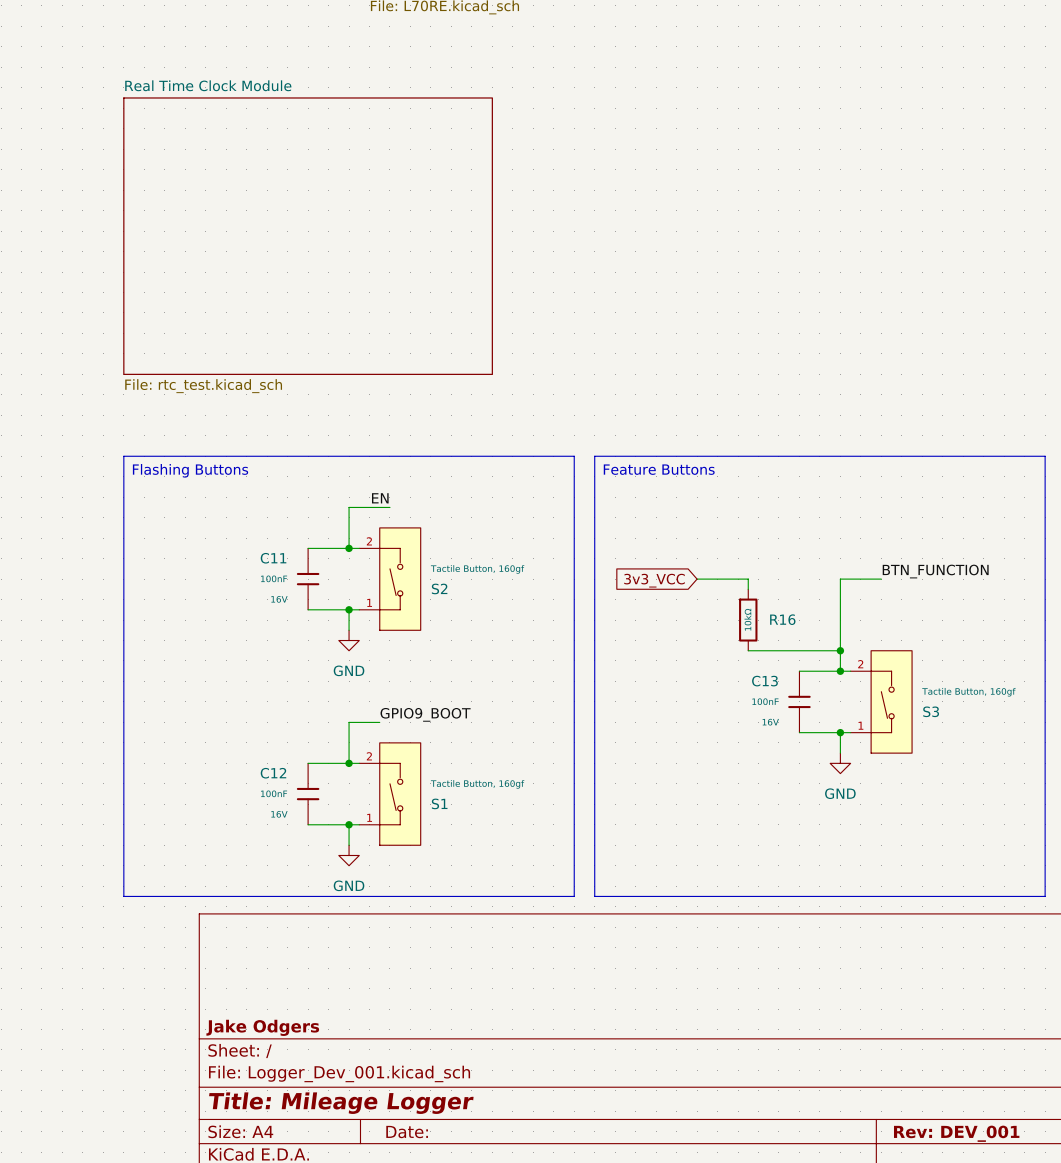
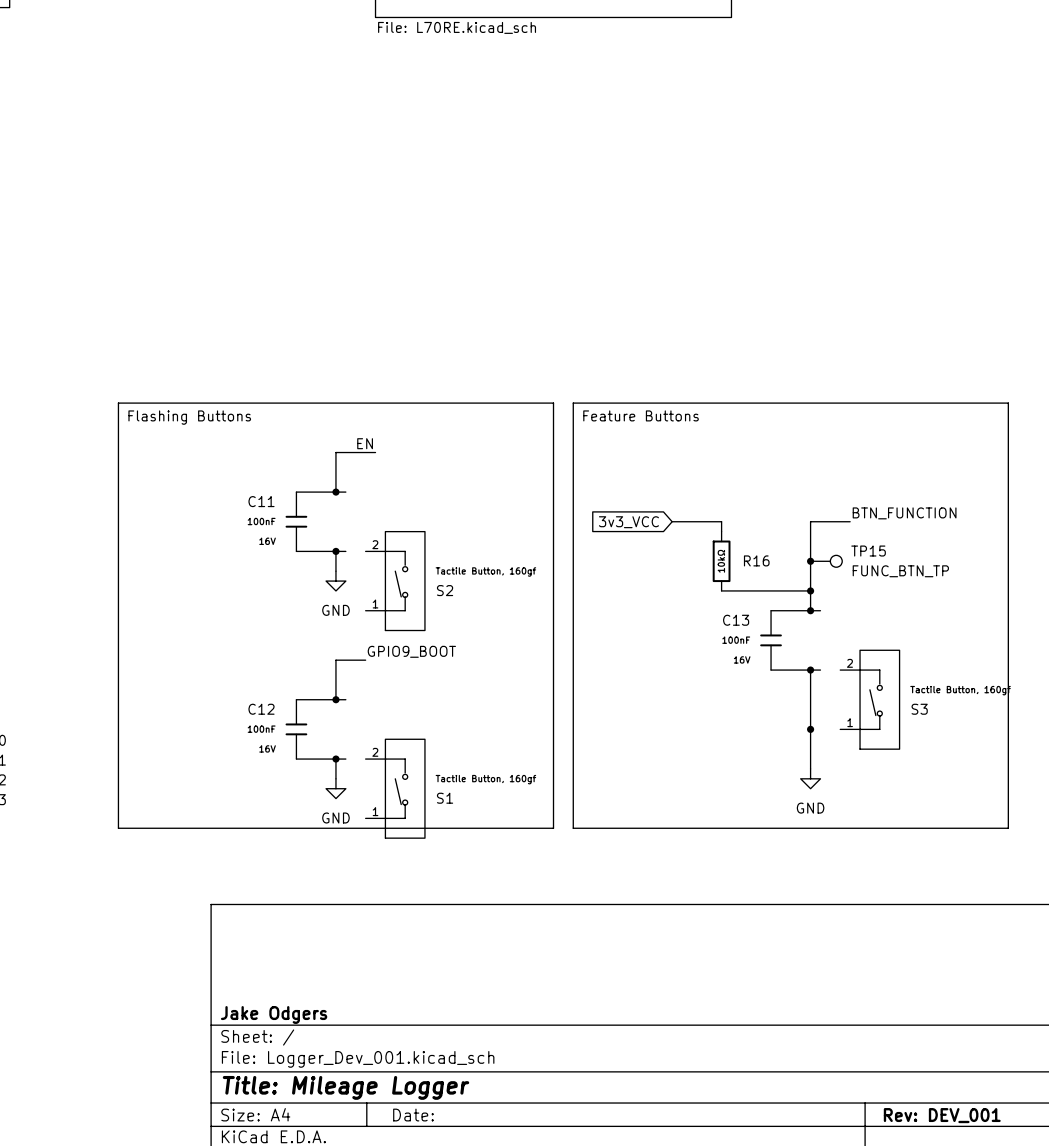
sheet Real Time Clock Module: File: rtc_test.kicad_sch (308, 236) -> none
line: none -> (118, 403) (553, 403) (553, 828) (118, 828) (118, 403)
line: (574, 456) (123, 456) (123, 896) (574, 896) (574, 835) -> (573, 462) (573, 403) (1008, 403) (1008, 828) (573, 828)
line: (594, 456) (1045, 456) (1045, 896) (594, 896) (594, 456) -> none
text position: Feature Buttons (659, 469) -> Feature Buttons (641, 415)
text position: Flashing Buttons (190, 470) -> Flashing Buttons (189, 417)
junction: none -> (335, 492)
label position: EN (380, 498) -> EN (365, 443)
wire: (389, 507) (349, 507) (349, 548) -> (375, 452) (335, 452) (335, 492)
wire: (338, 548) (359, 548) -> (296, 551) (316, 551)
junction position: (349, 548) -> (335, 551)
junction: none -> (810, 561)
TP15: none -> FUNC_BTN_TP (826, 561)
label position: BTN_FUNCTION (935, 571) -> BTN_FUNCTION (904, 513)
C11 position: (308, 579) -> (296, 521)
wire: (697, 579) (748, 579) (748, 589) -> (672, 521) (721, 521) (721, 531)
wire: (881, 579) (840, 579) (840, 671) -> (850, 521) (810, 521) (810, 610)
global label position: 3v3_VCC (654, 580) -> 3v3_VCC (628, 522)
junction: none -> (810, 590)
wire: (308, 609) (359, 609) -> (296, 492) (345, 492)
wire: (349, 609) (349, 630) -> (335, 551) (335, 571)
junction: (349, 609) -> none
junction: none -> (810, 610)
R16 position: (748, 620) -> (721, 561)
power symbol position: GND (349, 640) -> GND (335, 581)
wire: (748, 650) (840, 650) -> (721, 590) (810, 590)
junction: (840, 650) -> none
wire: none -> (810, 670) (810, 768)
junction: none -> (810, 670)
wire: (830, 671) (850, 671) -> (771, 670) (790, 670)
junction: (840, 671) -> none
junction: none -> (335, 699)
C13 position: (799, 701) -> (771, 640)
label position: GPIO9_BOOT (425, 714) -> GPIO9_BOOT (411, 651)
wire: (379, 722) (349, 722) (349, 763) -> (365, 660) (335, 660) (335, 699)
wire: (799, 732) (850, 732) -> (771, 610) (820, 610)
wire: (840, 732) (840, 753) -> none
junction position: (840, 732) -> (810, 729)
wire: (338, 763) (359, 763) -> (296, 759) (316, 759)
junction position: (349, 763) -> (335, 759)
power symbol position: GND (840, 763) -> GND (810, 778)
C12 position: (308, 794) -> (296, 729)
wire: (308, 824) (359, 824) -> (296, 699) (345, 699)
wire: (349, 824) (349, 845) -> (335, 759) (335, 778)
junction: (349, 824) -> none
power symbol position: GND (349, 855) -> GND (335, 788)

